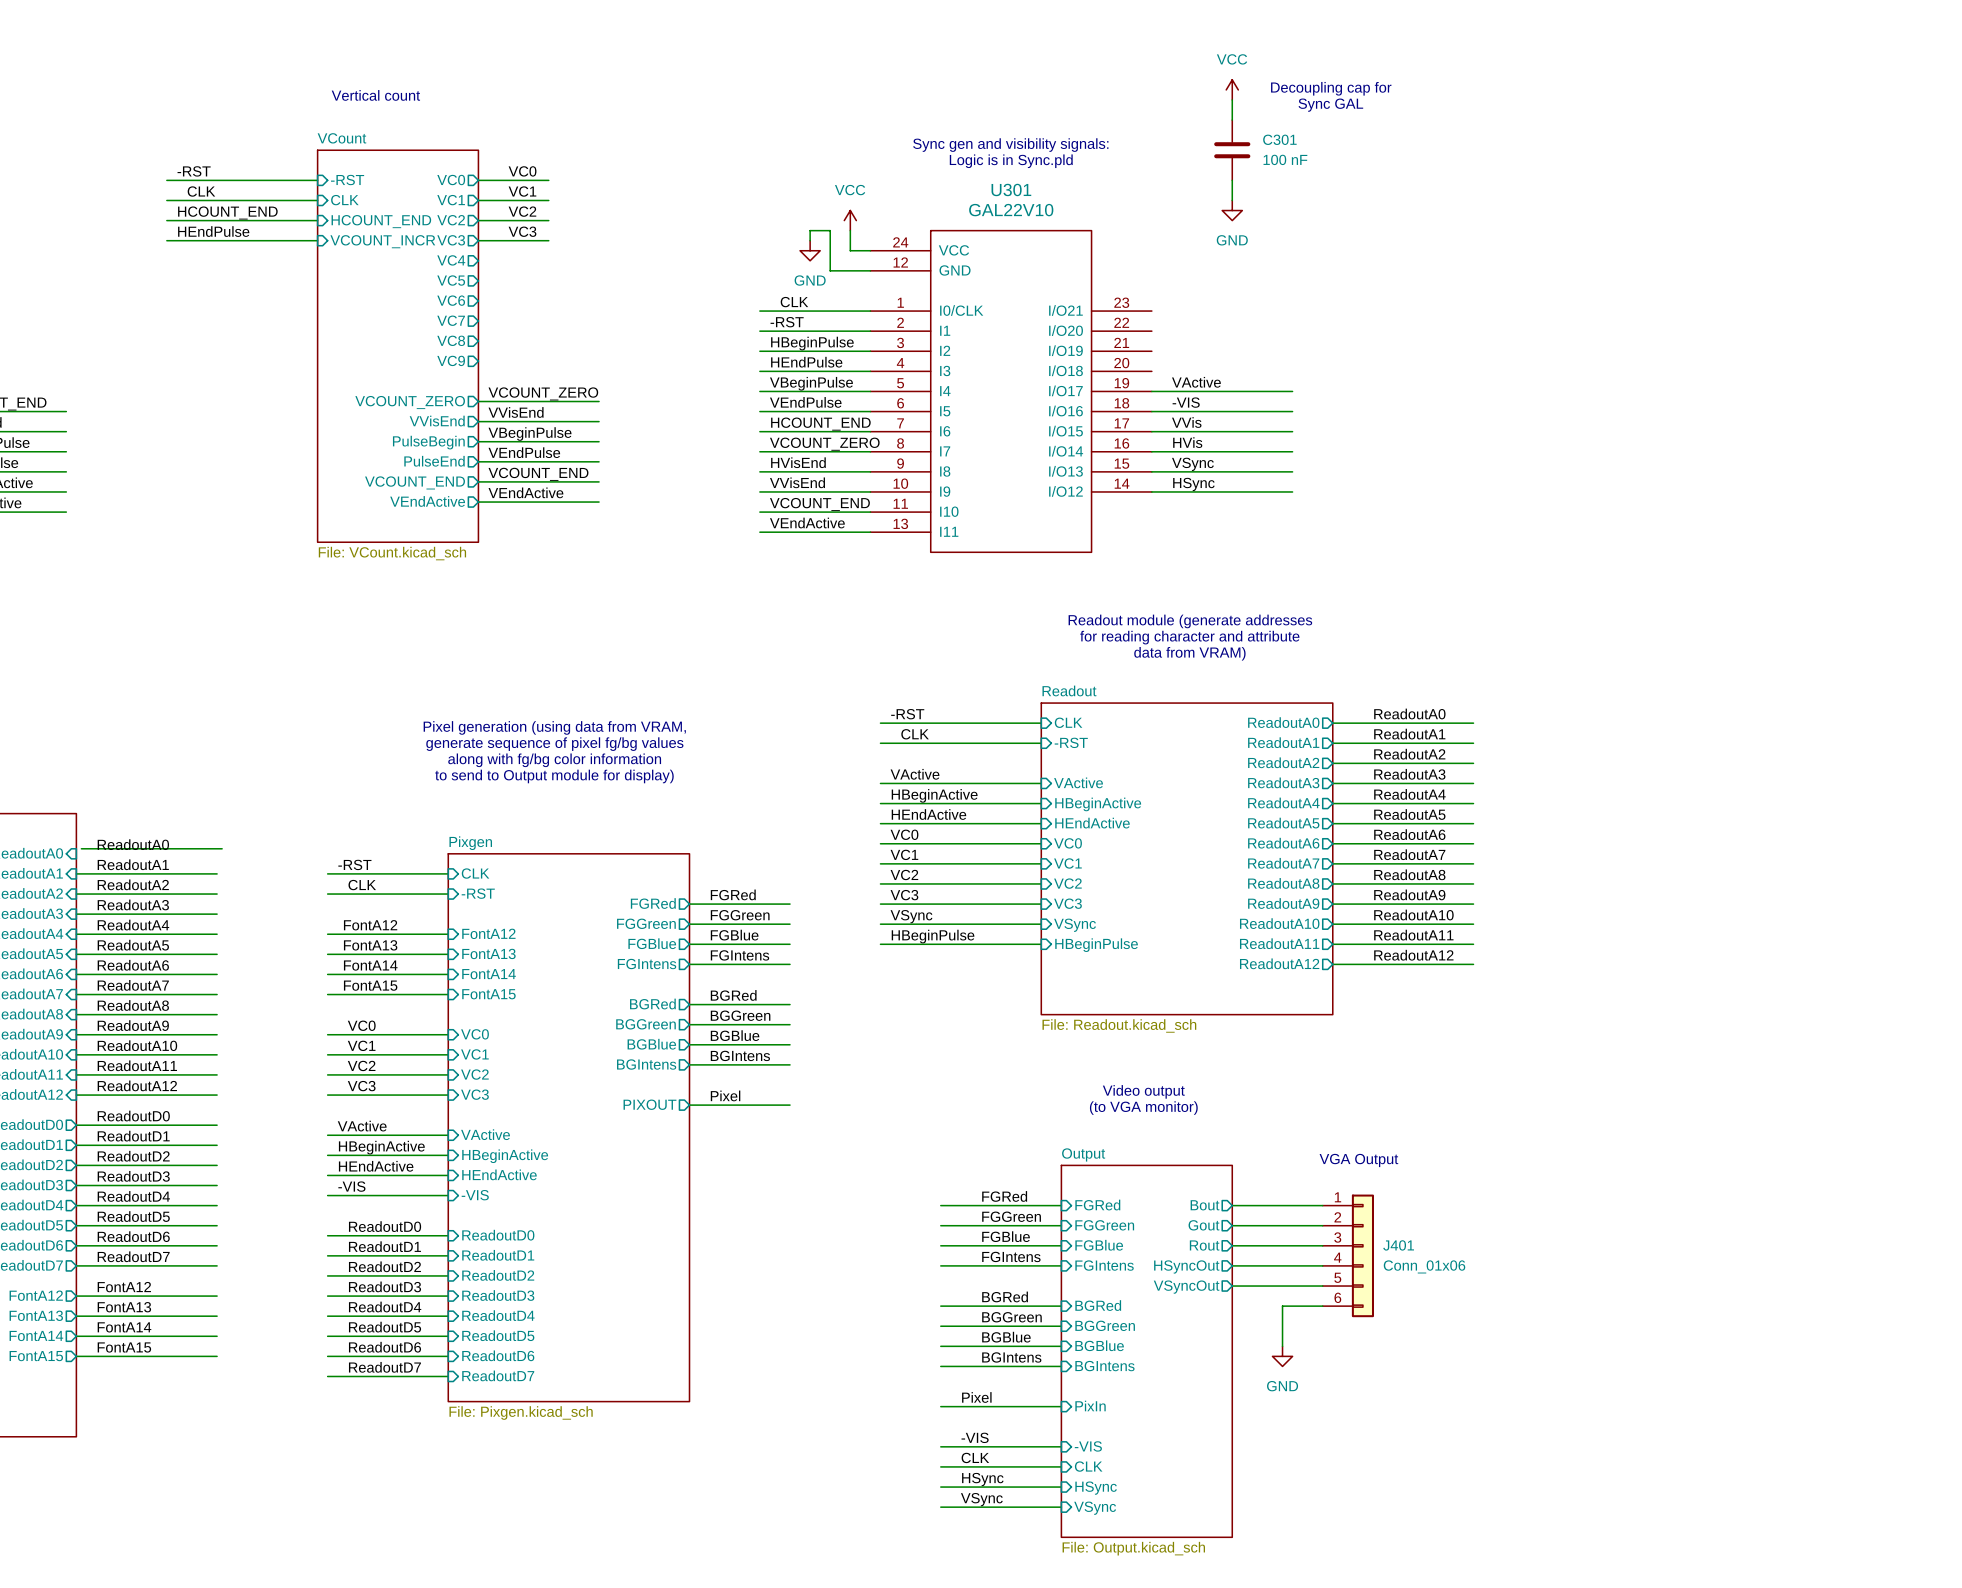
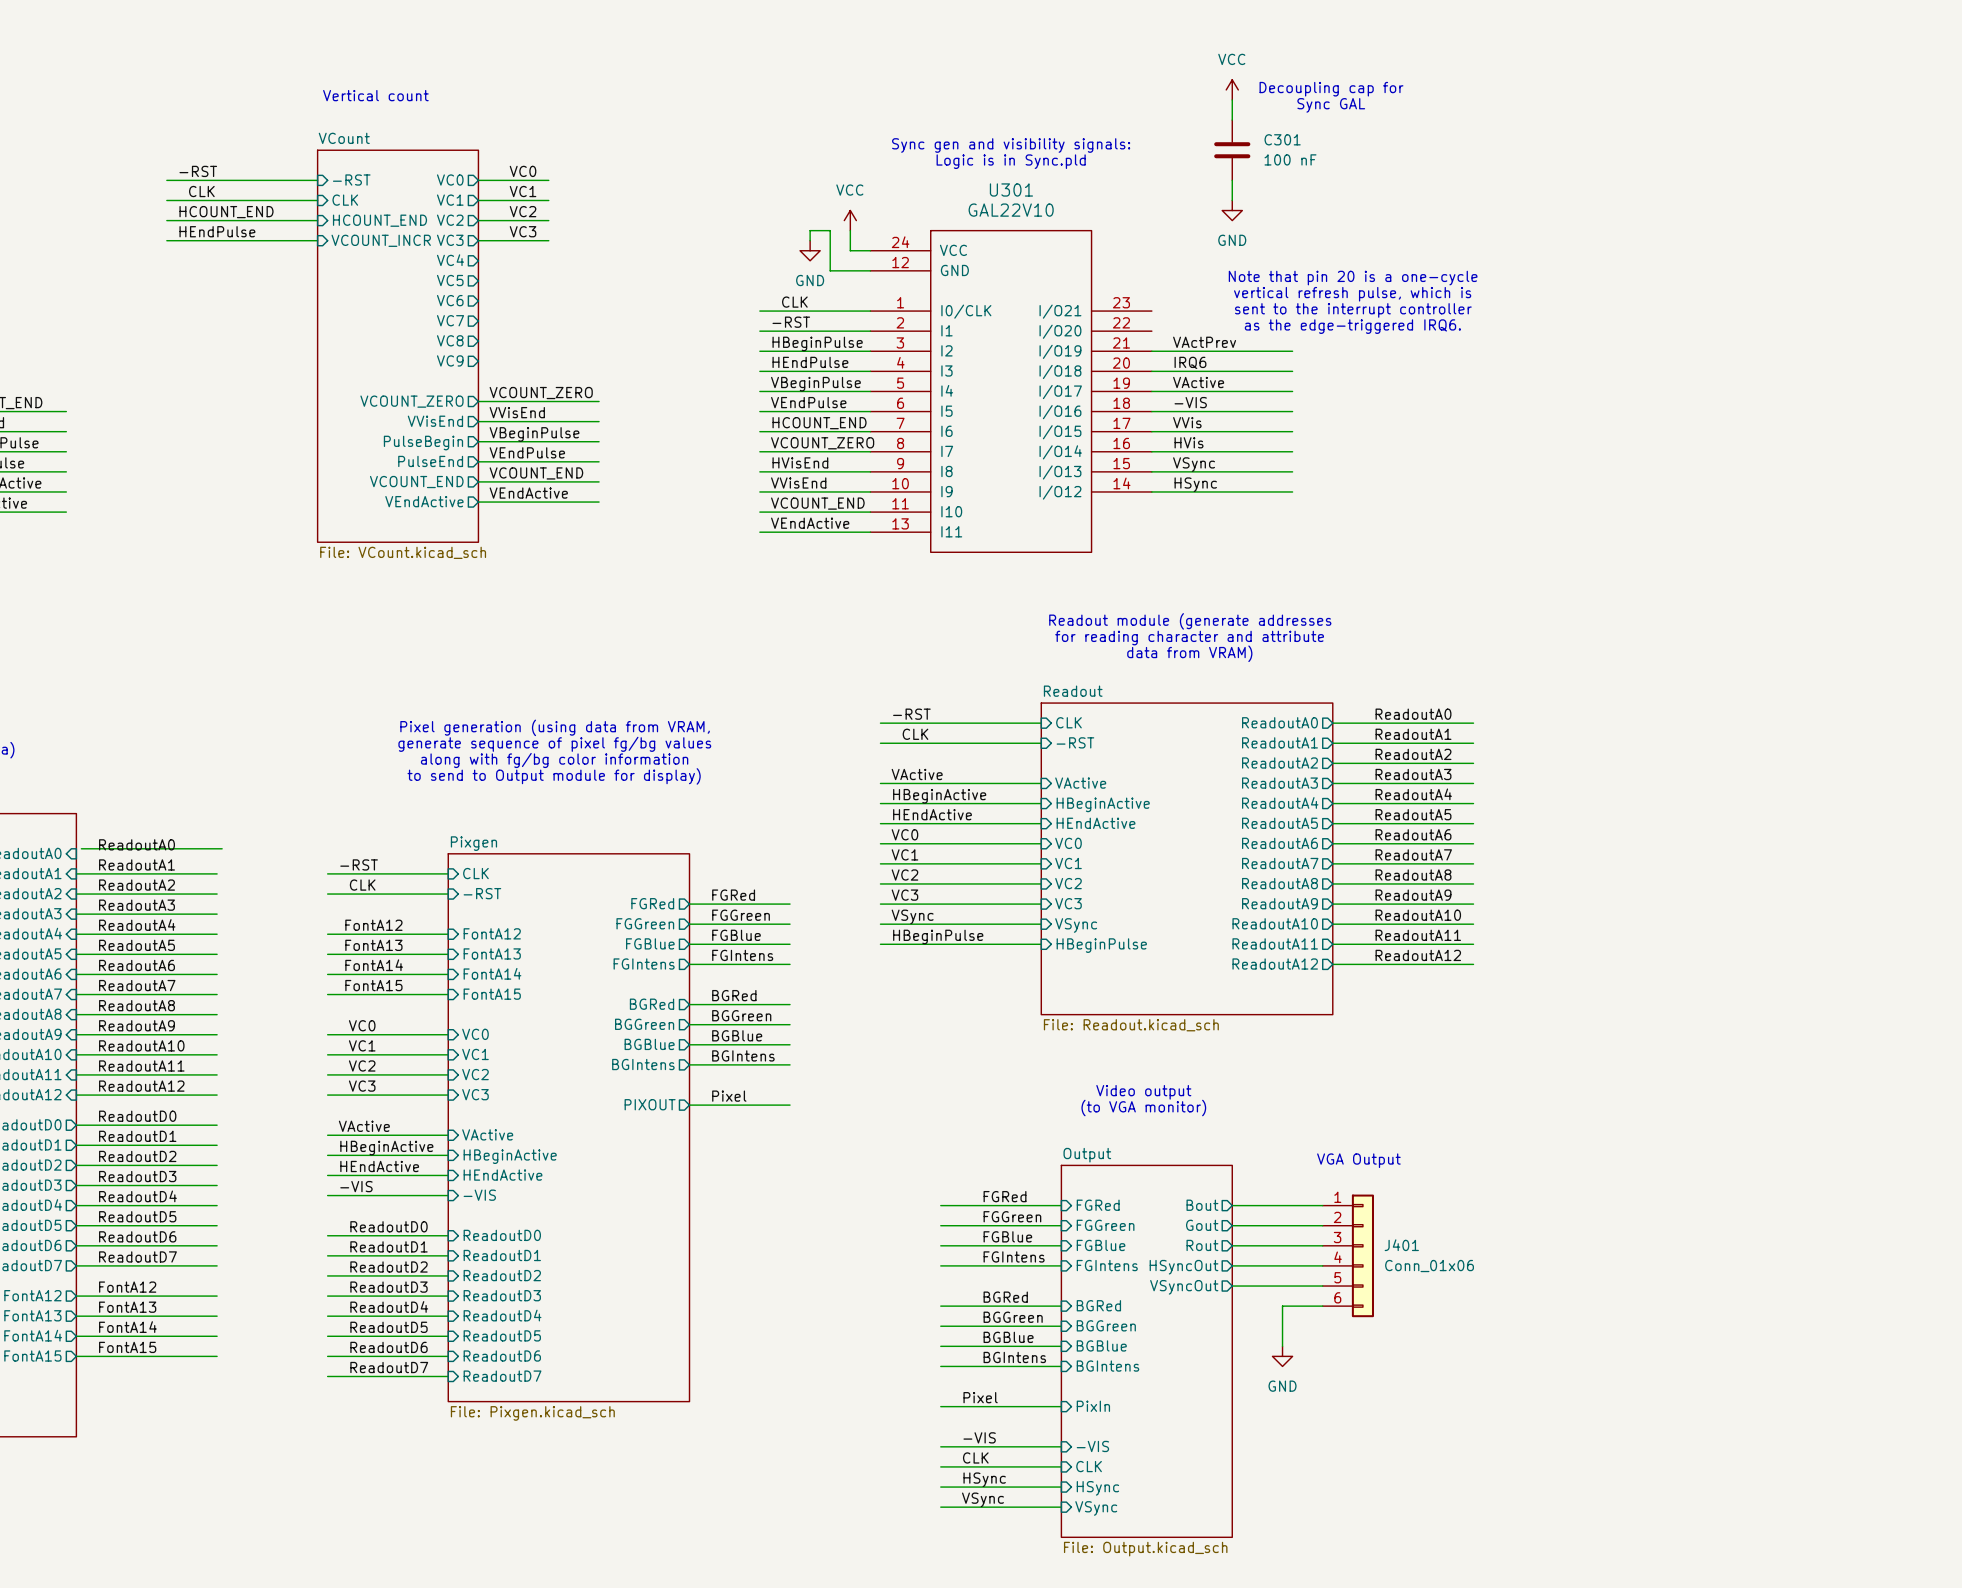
text: none -> Note that pin 20 is a one-cycle (1353, 278)
text: none -> vertical refresh pulse, which is (1352, 294)
text: none -> sent to the interrupt controller (1353, 310)
text: none -> as the edge-triggered IRQ6. (1352, 326)
label: none -> VActPrev (1204, 342)
wire: none -> (1151, 351) (1292, 351)
label: none -> IRQ6 (1190, 362)
wire: none -> (1151, 371) (1292, 371)

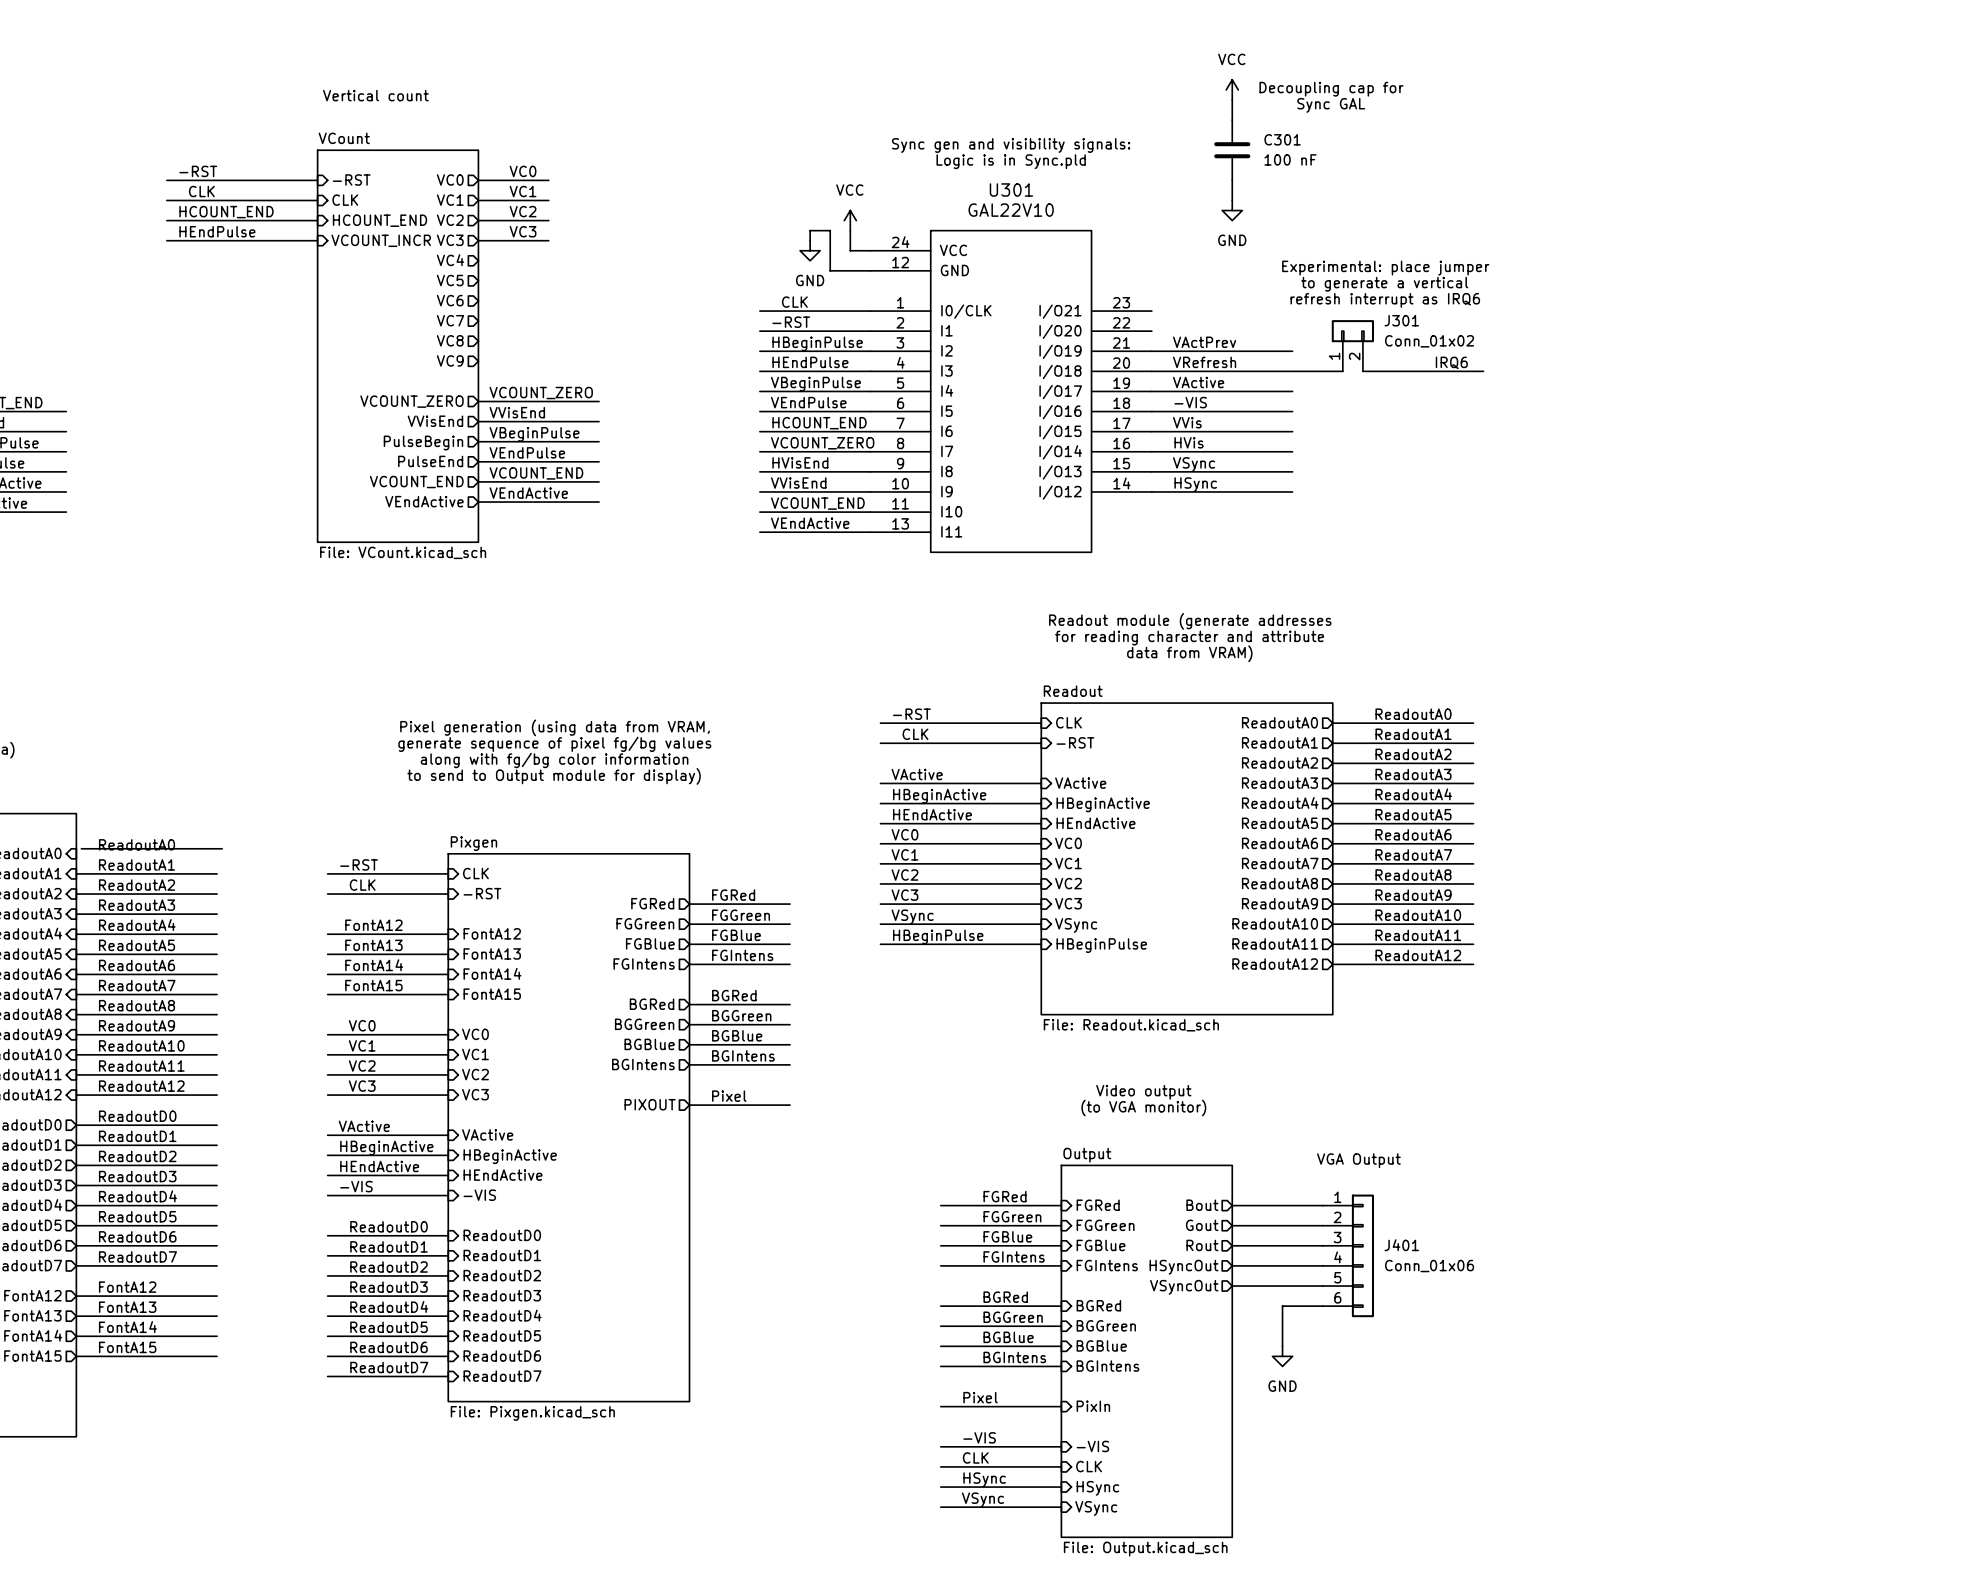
text: none -> Experimental: place jumper (1385, 268)
text: Note that pin 20 is a one-cycle (1353, 278) -> none
text: none -> to generate a vertical (1384, 284)
text: vertical refresh pulse, which is (1352, 294) -> none
text: none -> refresh interrupt as IRQ6 (1385, 300)
text: sent to the interrupt controller (1353, 310) -> none
text: as the edge-triggered IRQ6. (1352, 326) -> none
J301: none -> Conn_01x02 (1352, 345)
label: IRQ6 (1190, 362) -> VRefresh (1204, 362)
label: none -> IRQ6 (1451, 362)
wire: none -> (1292, 371) (1342, 371)
wire: none -> (1362, 371) (1483, 371)

